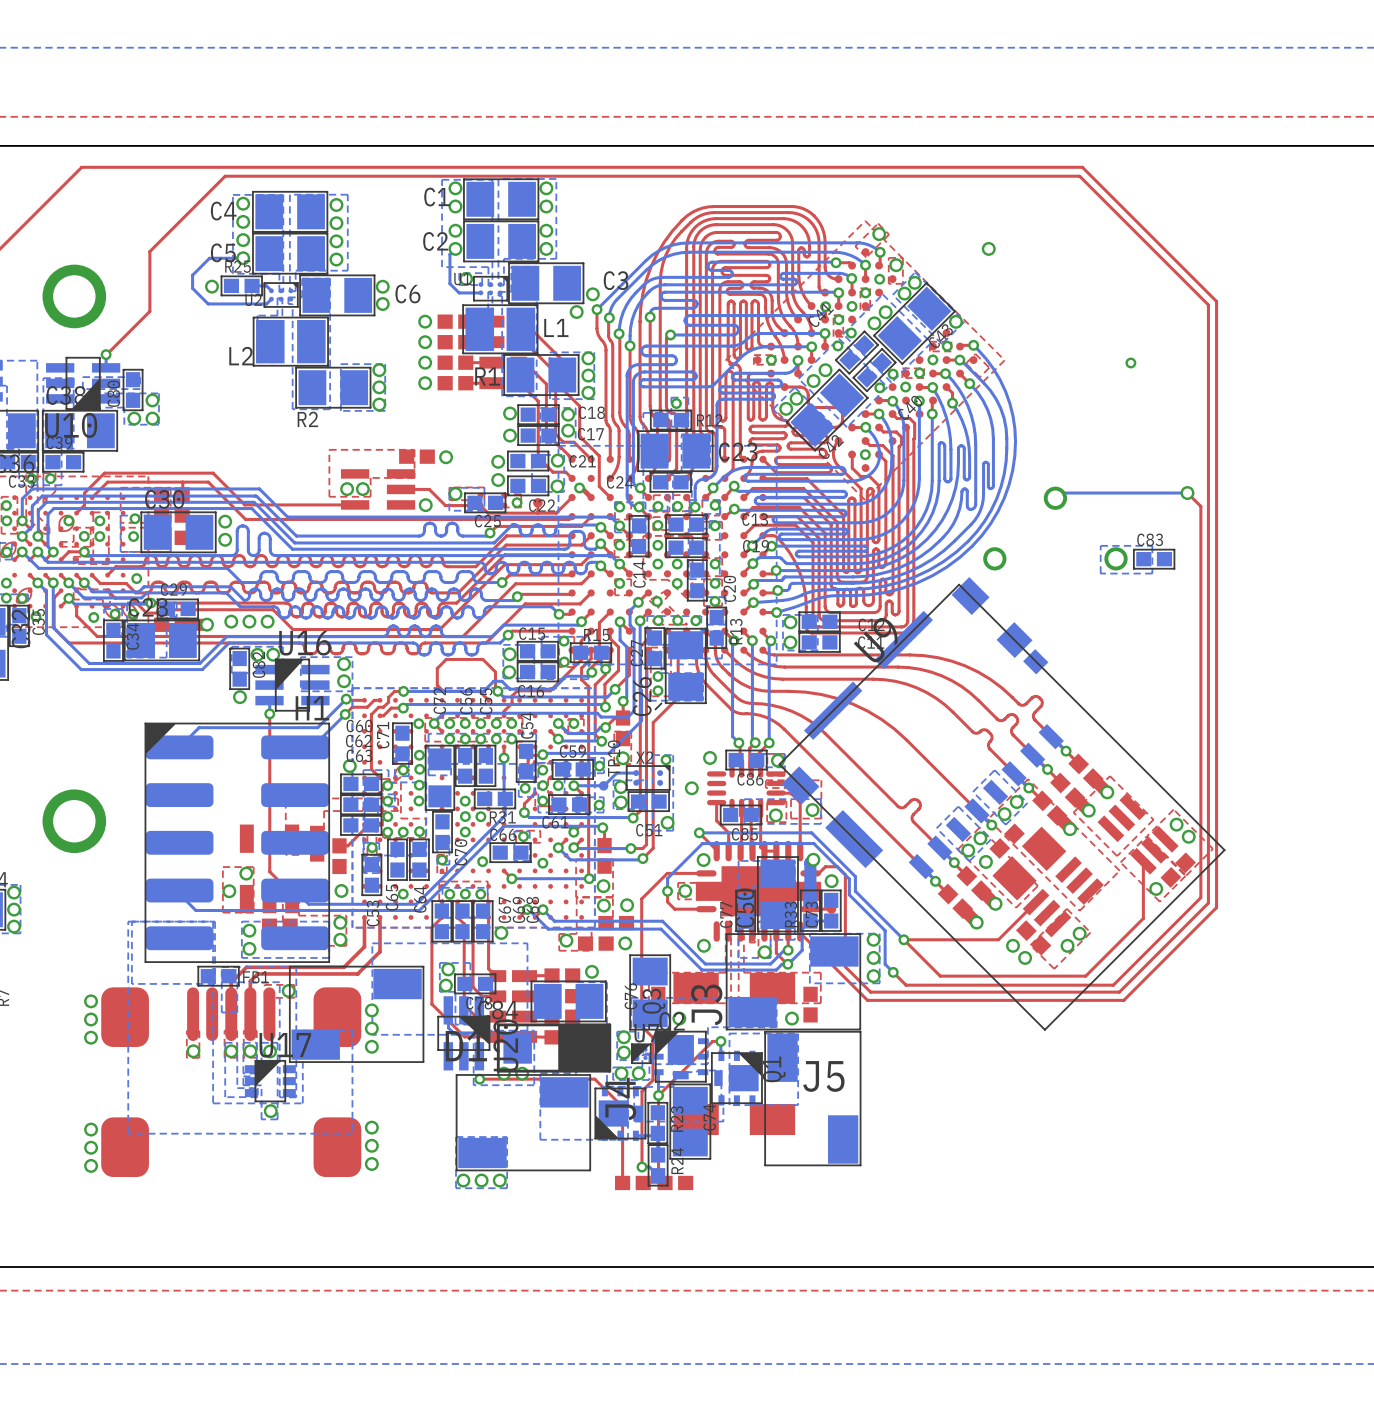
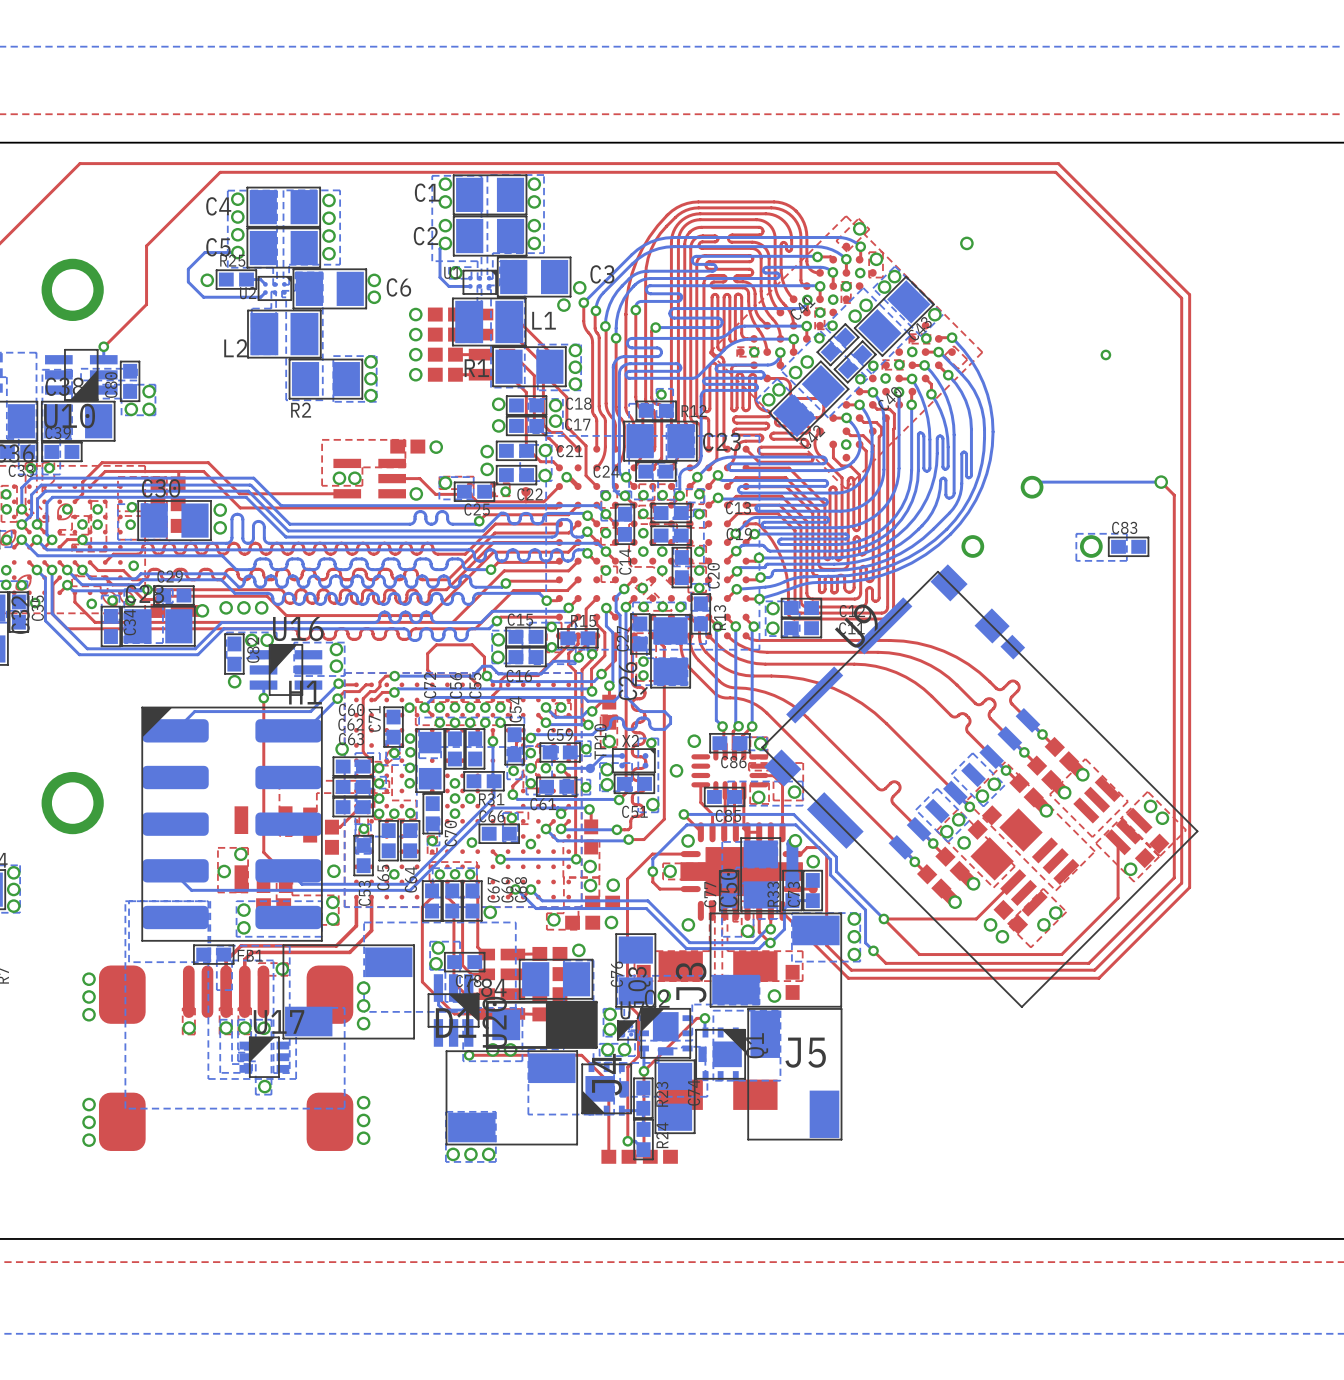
top track: (676, 640) (678, 697) (653, 722) (653, 848) (642, 858) -> (661, 626) (661, 644) (664, 647) (664, 819) (643, 839) (628, 839)
top track: (646, 652) (645, 846) -> (632, 637) (632, 683) (635, 686) (642, 688) (644, 692) (642, 697) (635, 699) (632, 702) (633, 708) (642, 711) (644, 717) (642, 721) (635, 722) (632, 725) (633, 731) (642, 733) (644, 739) (642, 743) (634, 746) (632, 752) (635, 756) (643, 757) (645, 763) (643, 767) (635, 768) (632, 772) (633, 778) (642, 781) (644, 787) (642, 791) (635, 792) (632, 795) (633, 803) (641, 805) (643, 811) (640, 815) (631, 818) (630, 827)
bottom track: (640, 689) (641, 720) (609, 753) (544, 753) -> (625, 674) (625, 696) (640, 711) (664, 711) (670, 717) (670, 723) (664, 729) (652, 728) (648, 720) (644, 718) (638, 719) (634, 728) (627, 729) (624, 726) (622, 719) (615, 718) (611, 720) (608, 728) (597, 729) (592, 734) (534, 734) (532, 736)

